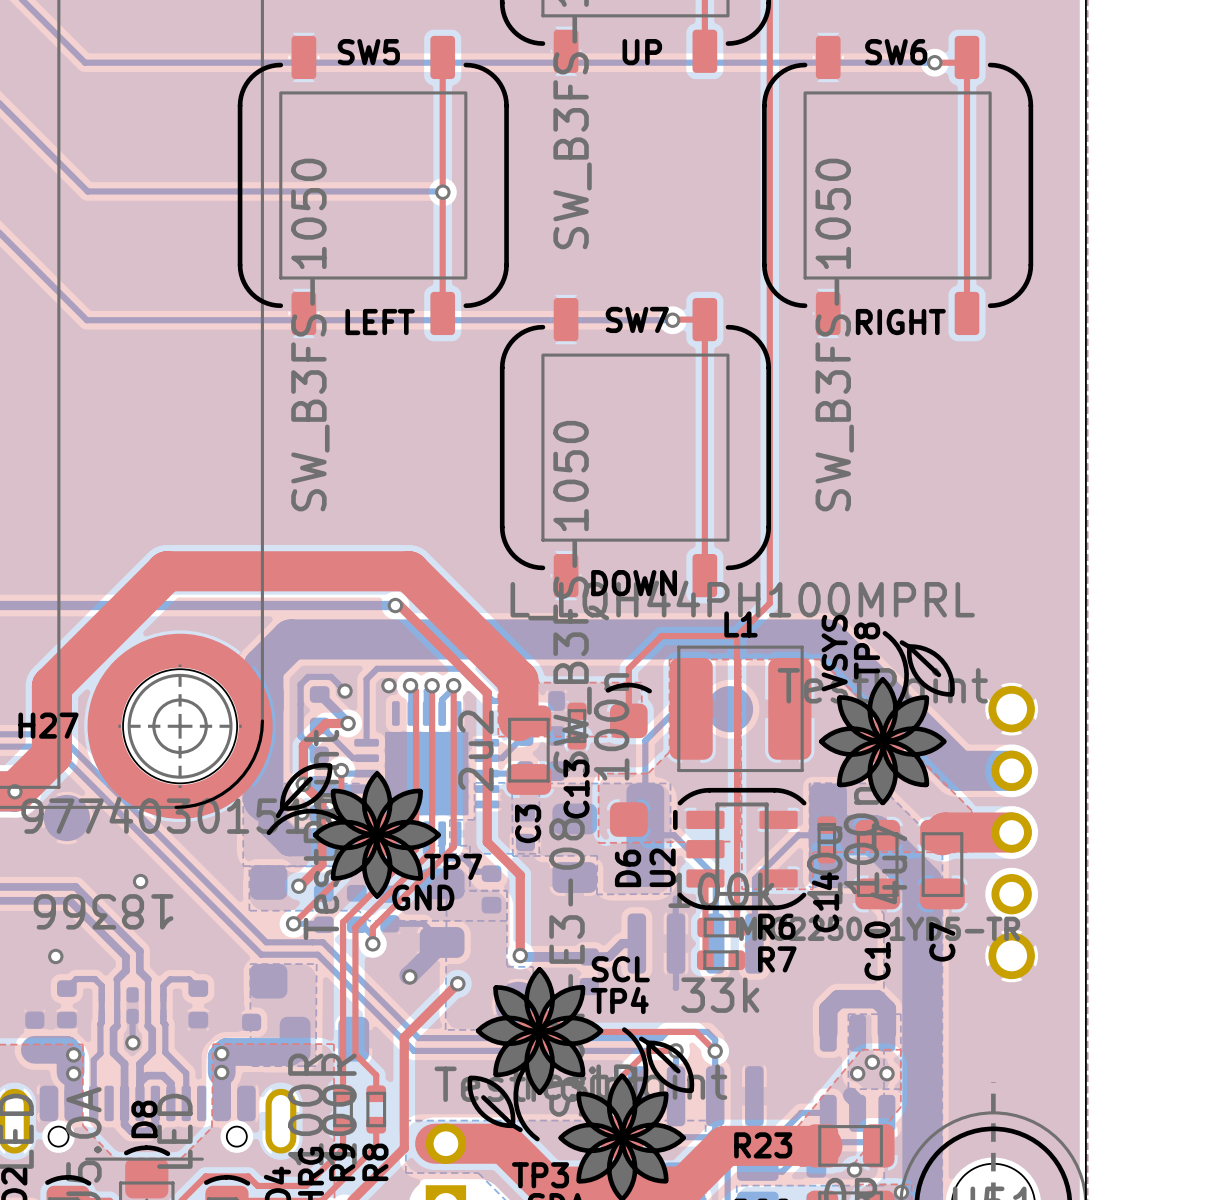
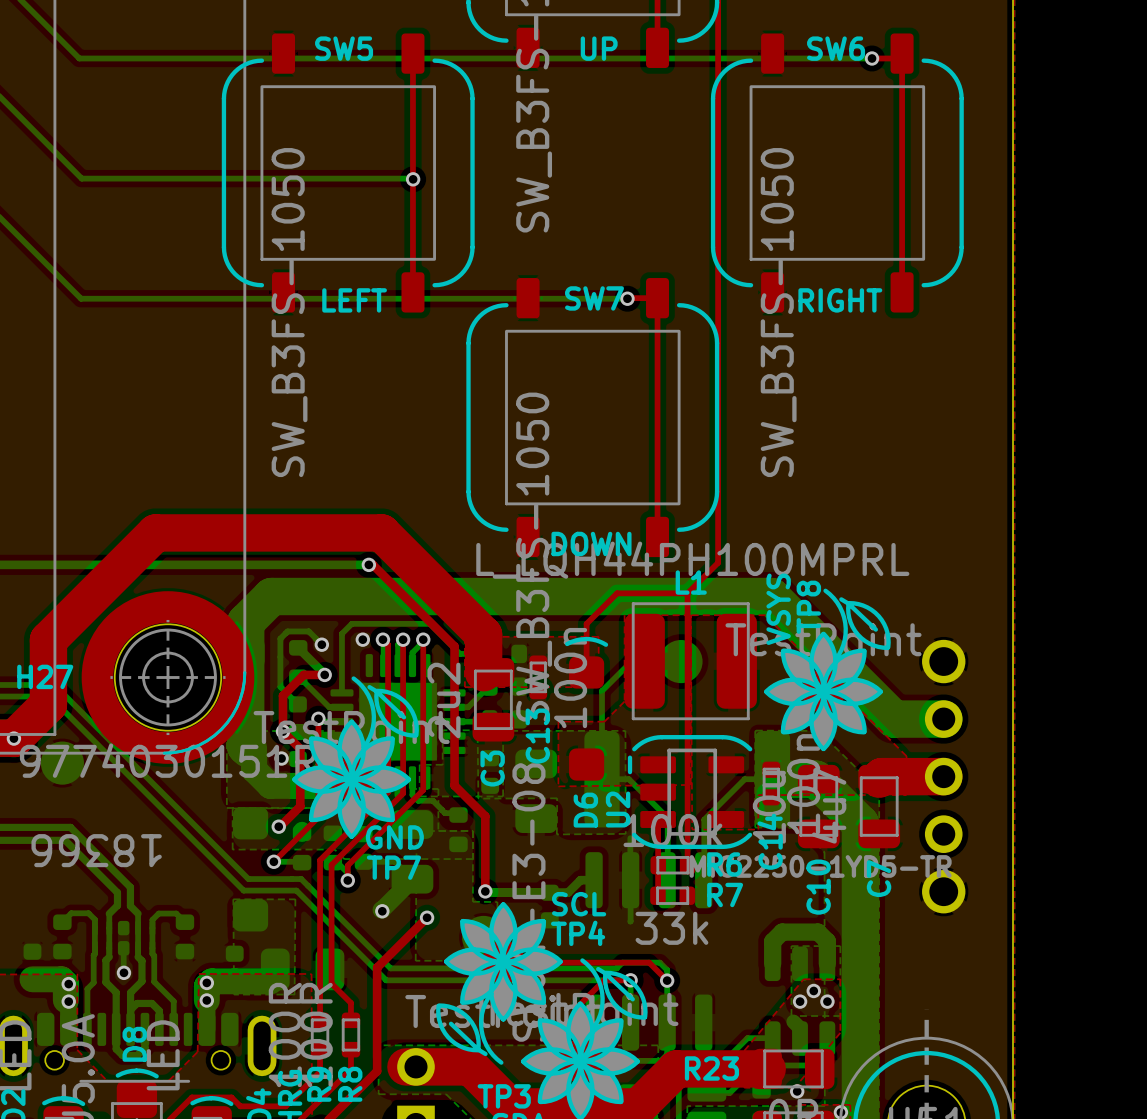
TP7 rotation: 0° (353, 830) -> 90° clockwise (355, 757)
TP7 name position: TP7 (453, 866) -> TP7 (393, 867)
via: (140, 881) -> none
via: (55, 956) -> none

